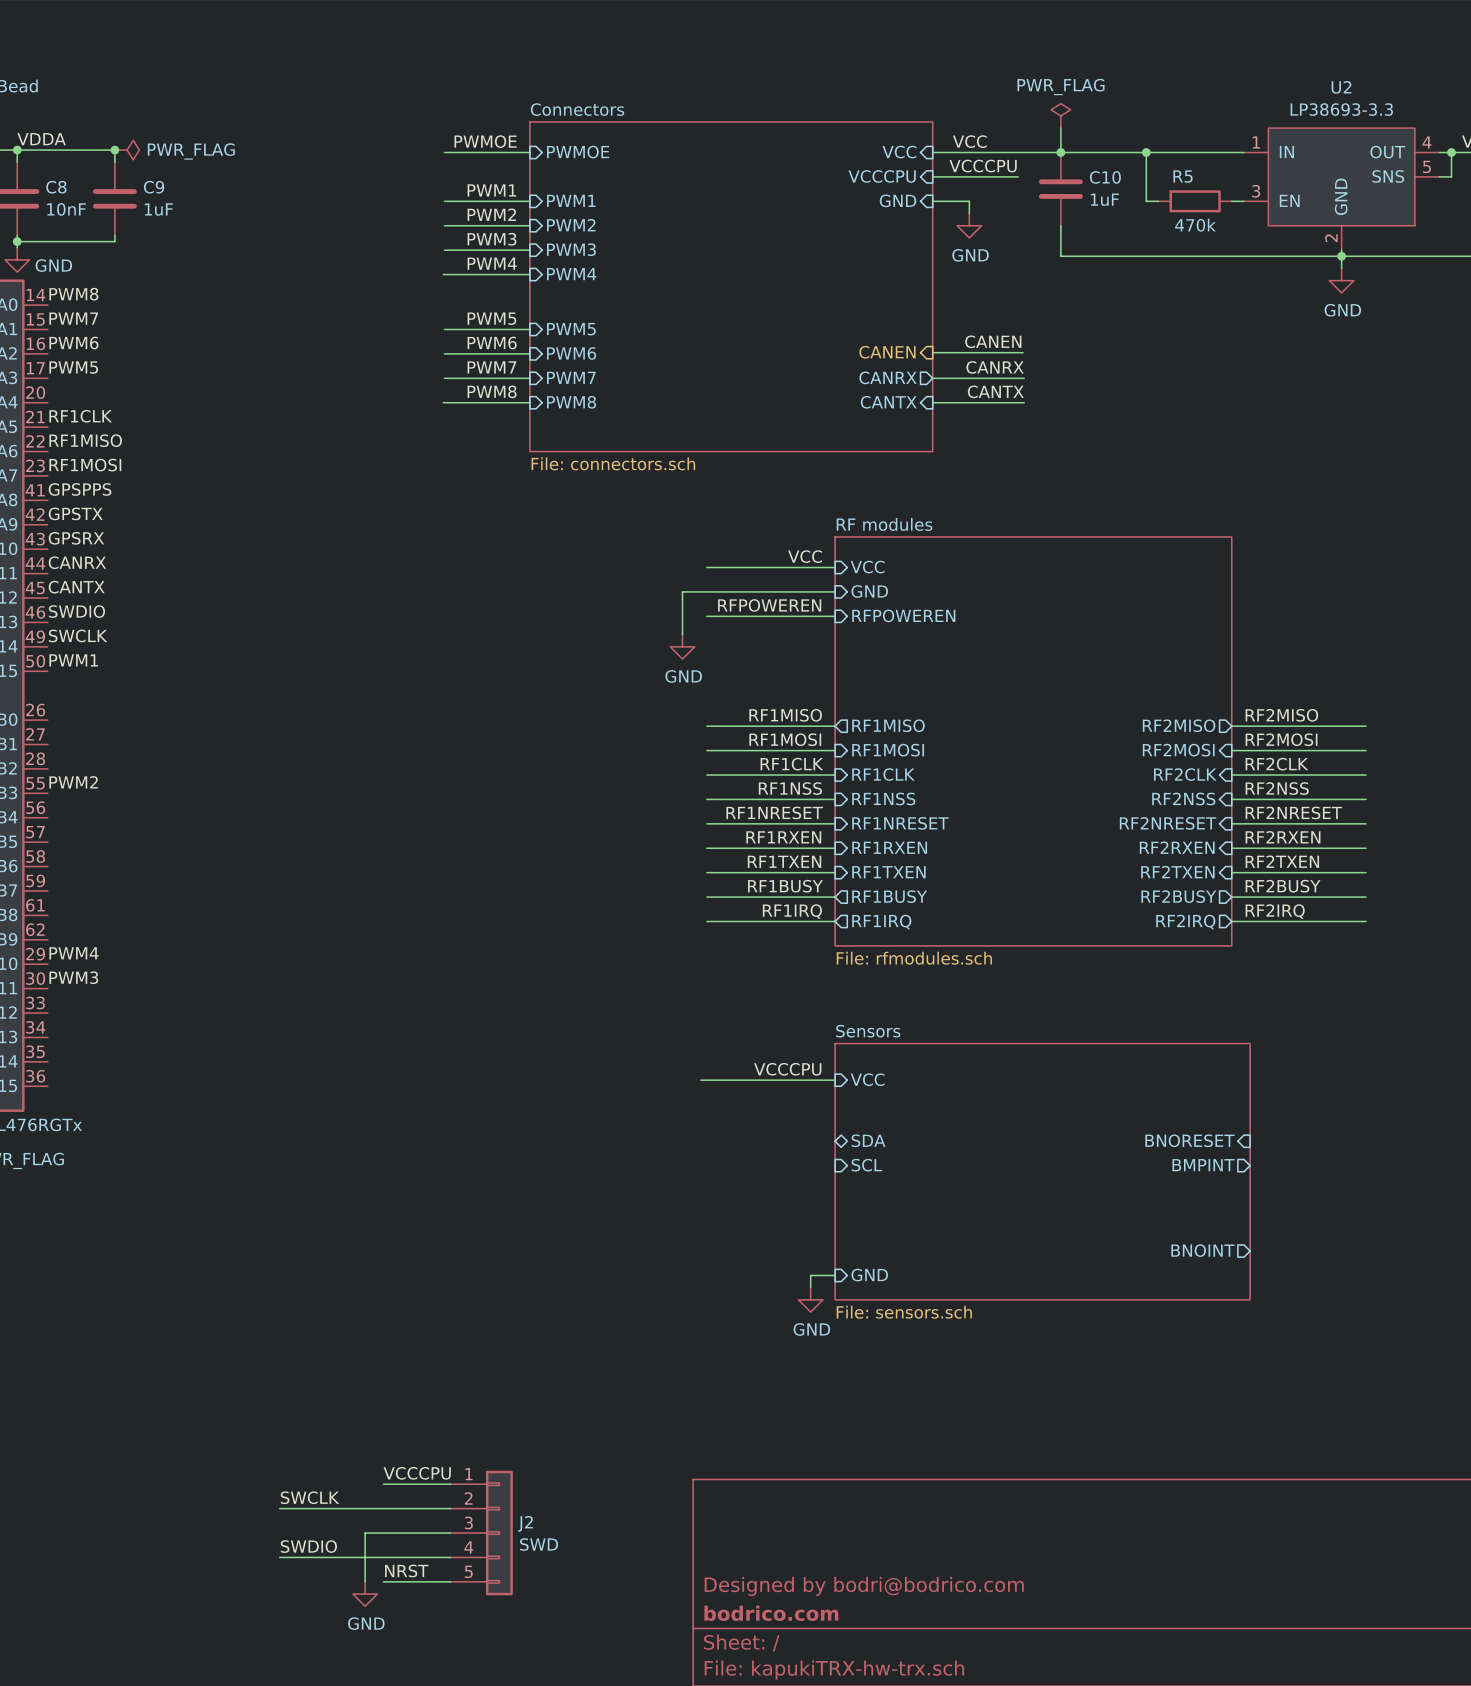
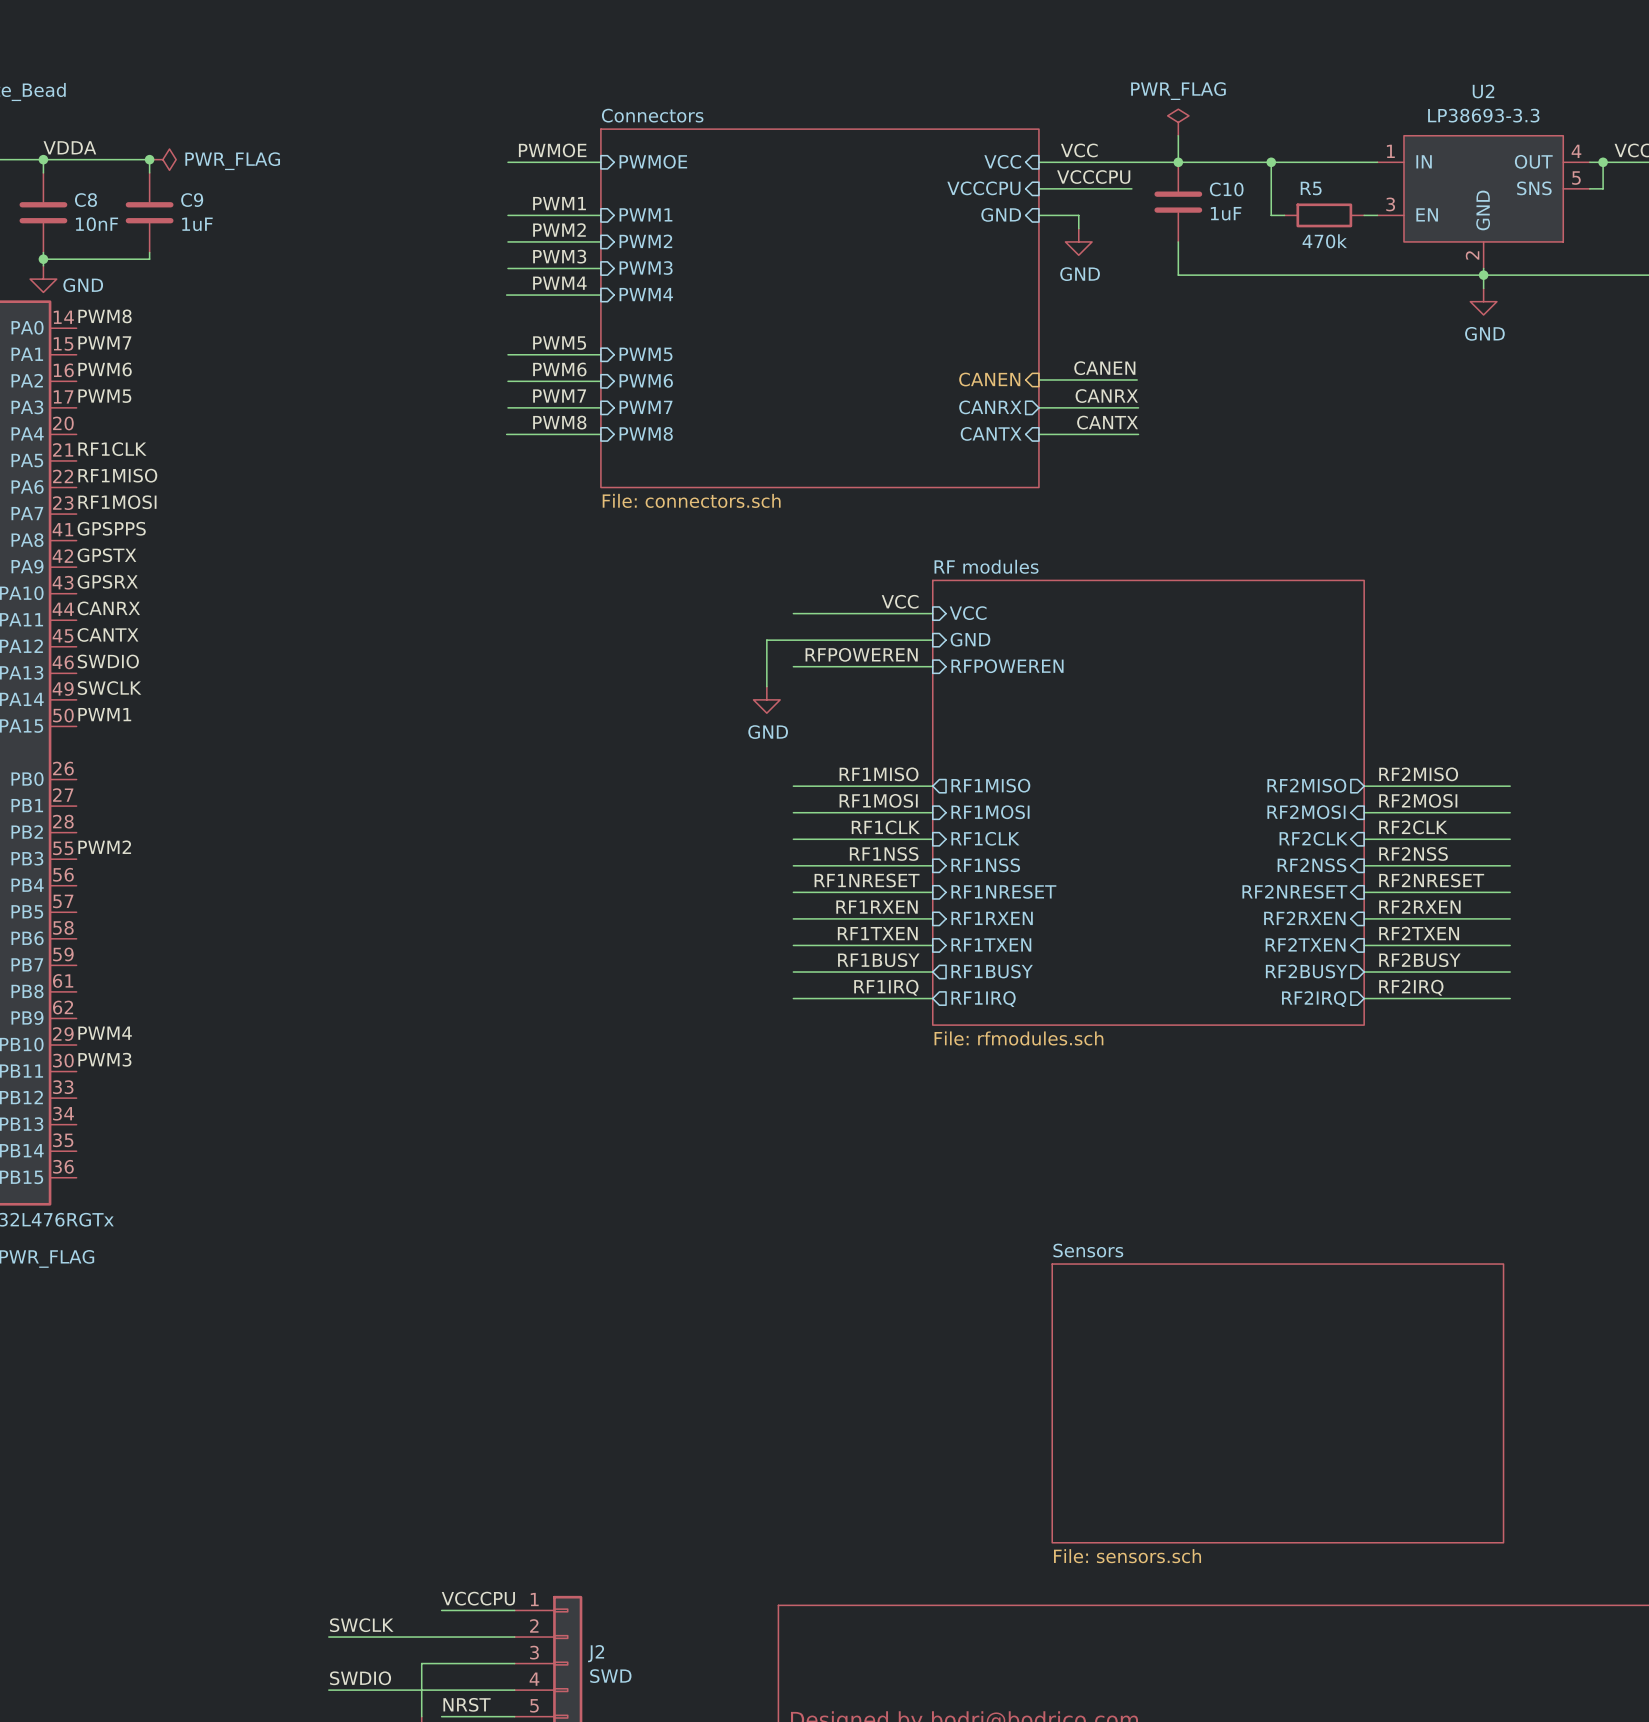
label: VCCCPU (787, 1069) -> none
sheet pin: VCC (867, 1079) -> none
wire: (700, 1080) (835, 1080) -> none
sheet pin: SDA (868, 1140) -> none
sheet pin: BNORESET (1190, 1140) -> none
sheet pin: SCL (866, 1165) -> none
sheet pin: BMPINT (1203, 1165) -> none
sheet Sensors position: (1042, 1171) -> (1277, 1403)
sheet pin: BNOINT (1202, 1250) -> none
wire: (835, 1275) (810, 1275) (810, 1287) -> none
sheet pin: GND (869, 1275) -> none
power symbol: GND (810, 1299) -> none

